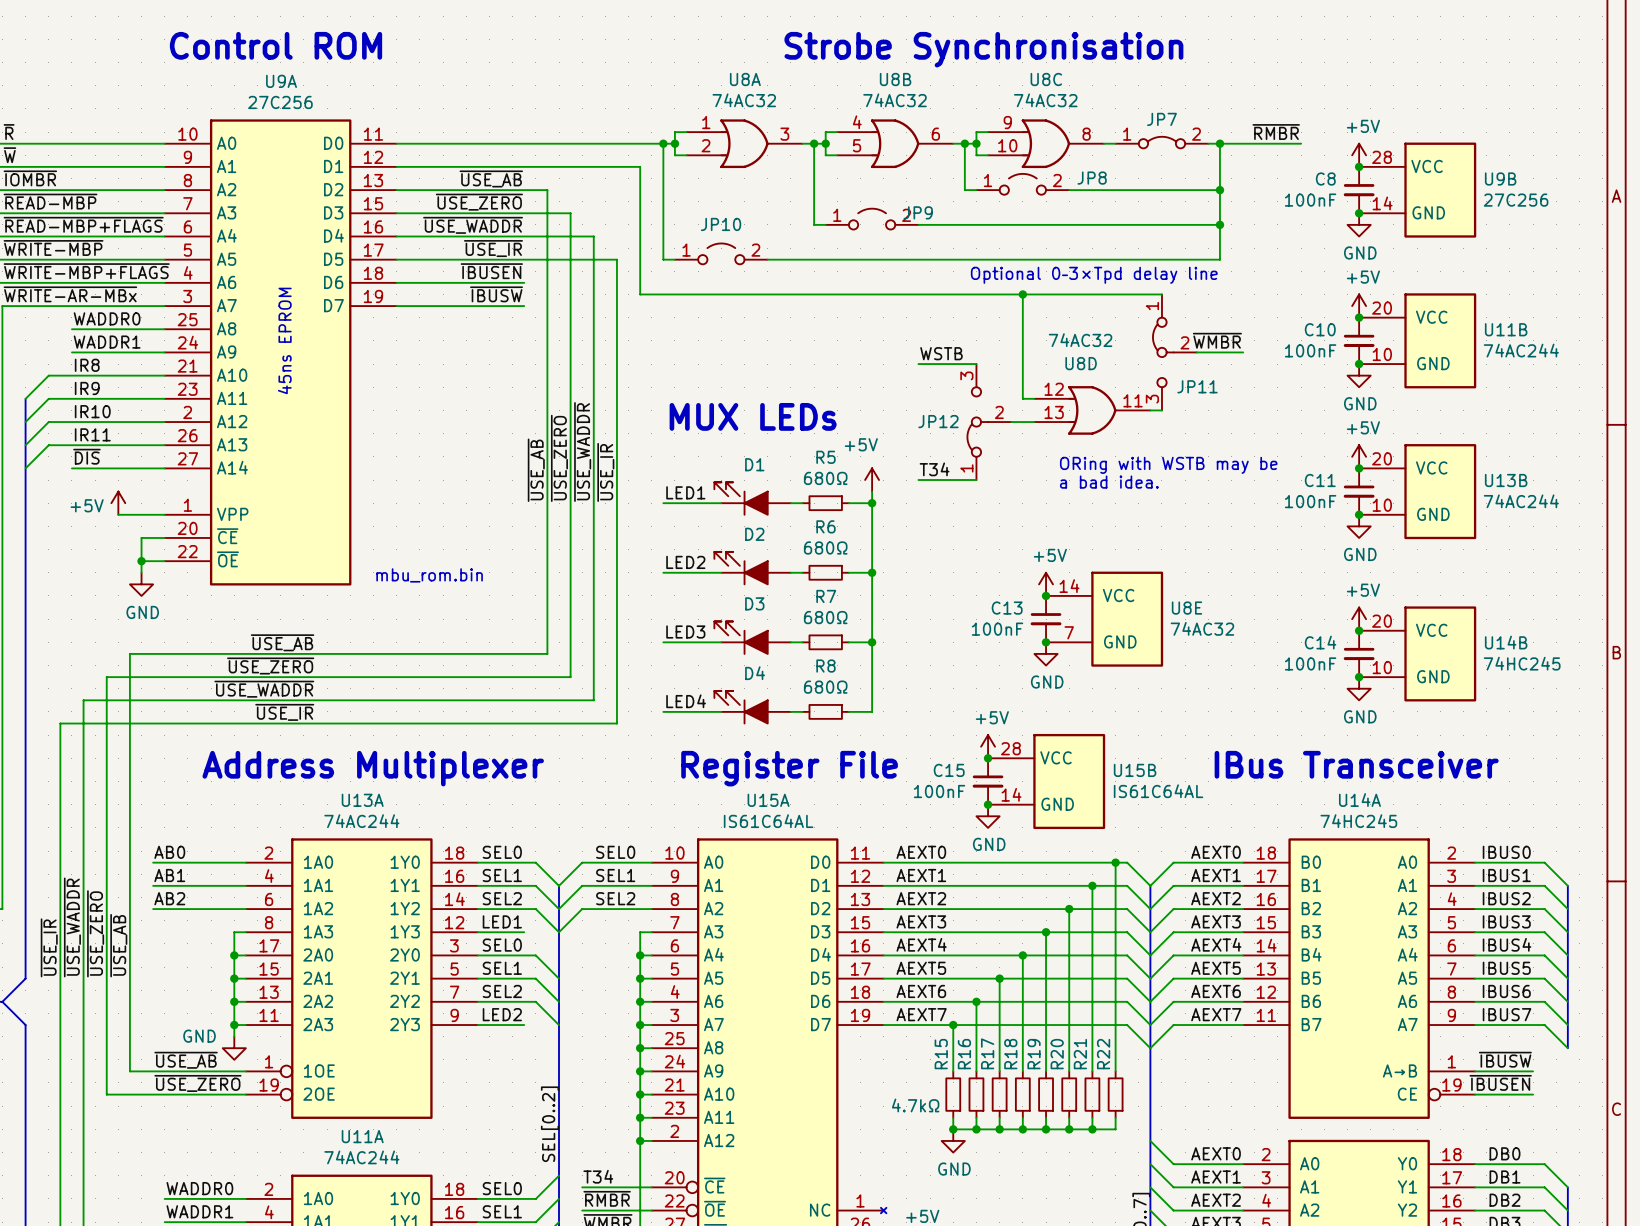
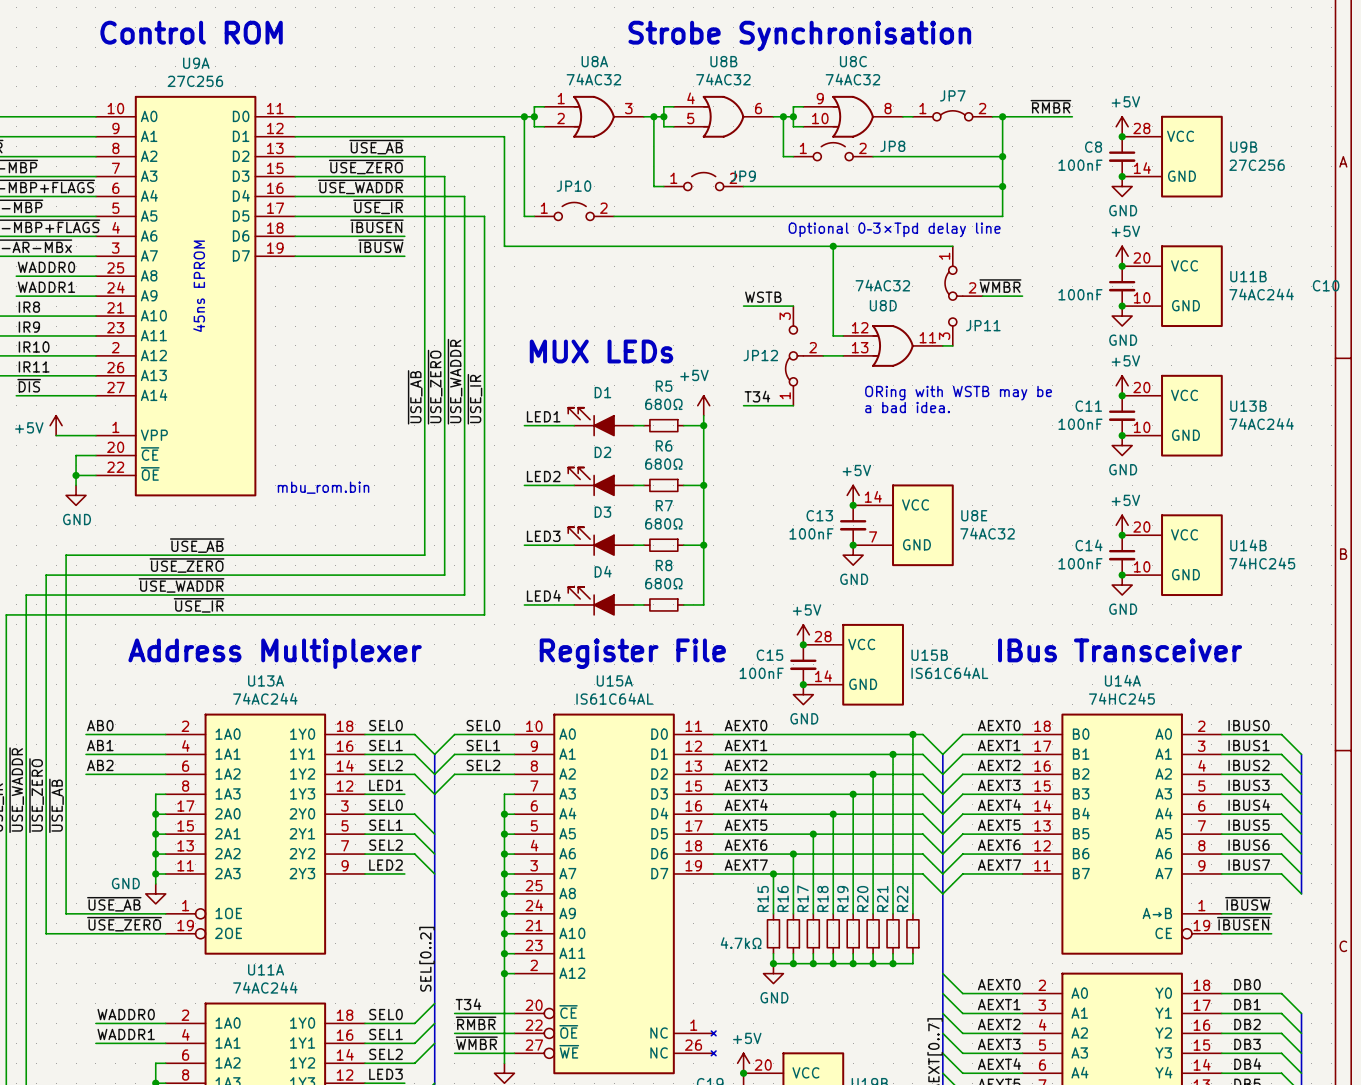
C10 name position: C10 (1320, 329) -> C10 (1326, 285)

